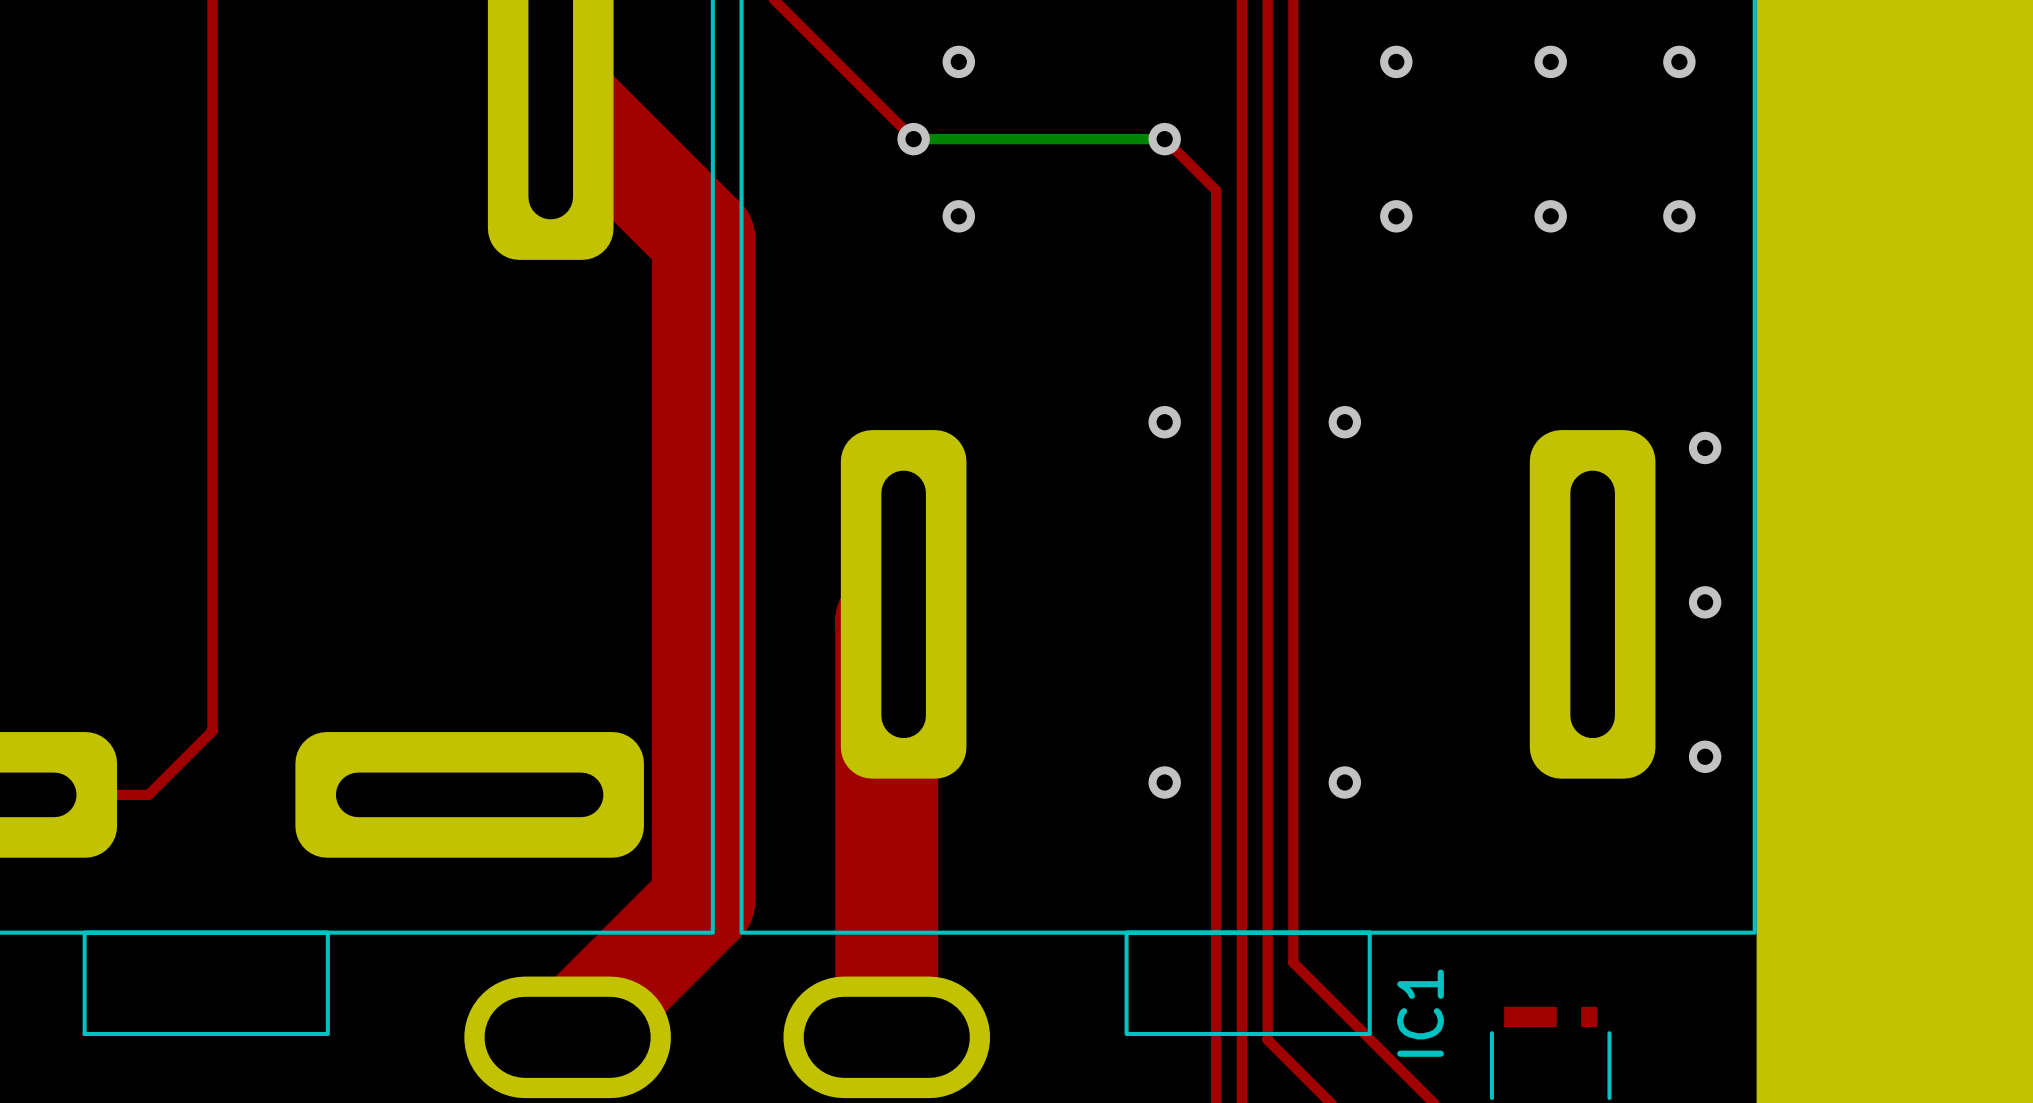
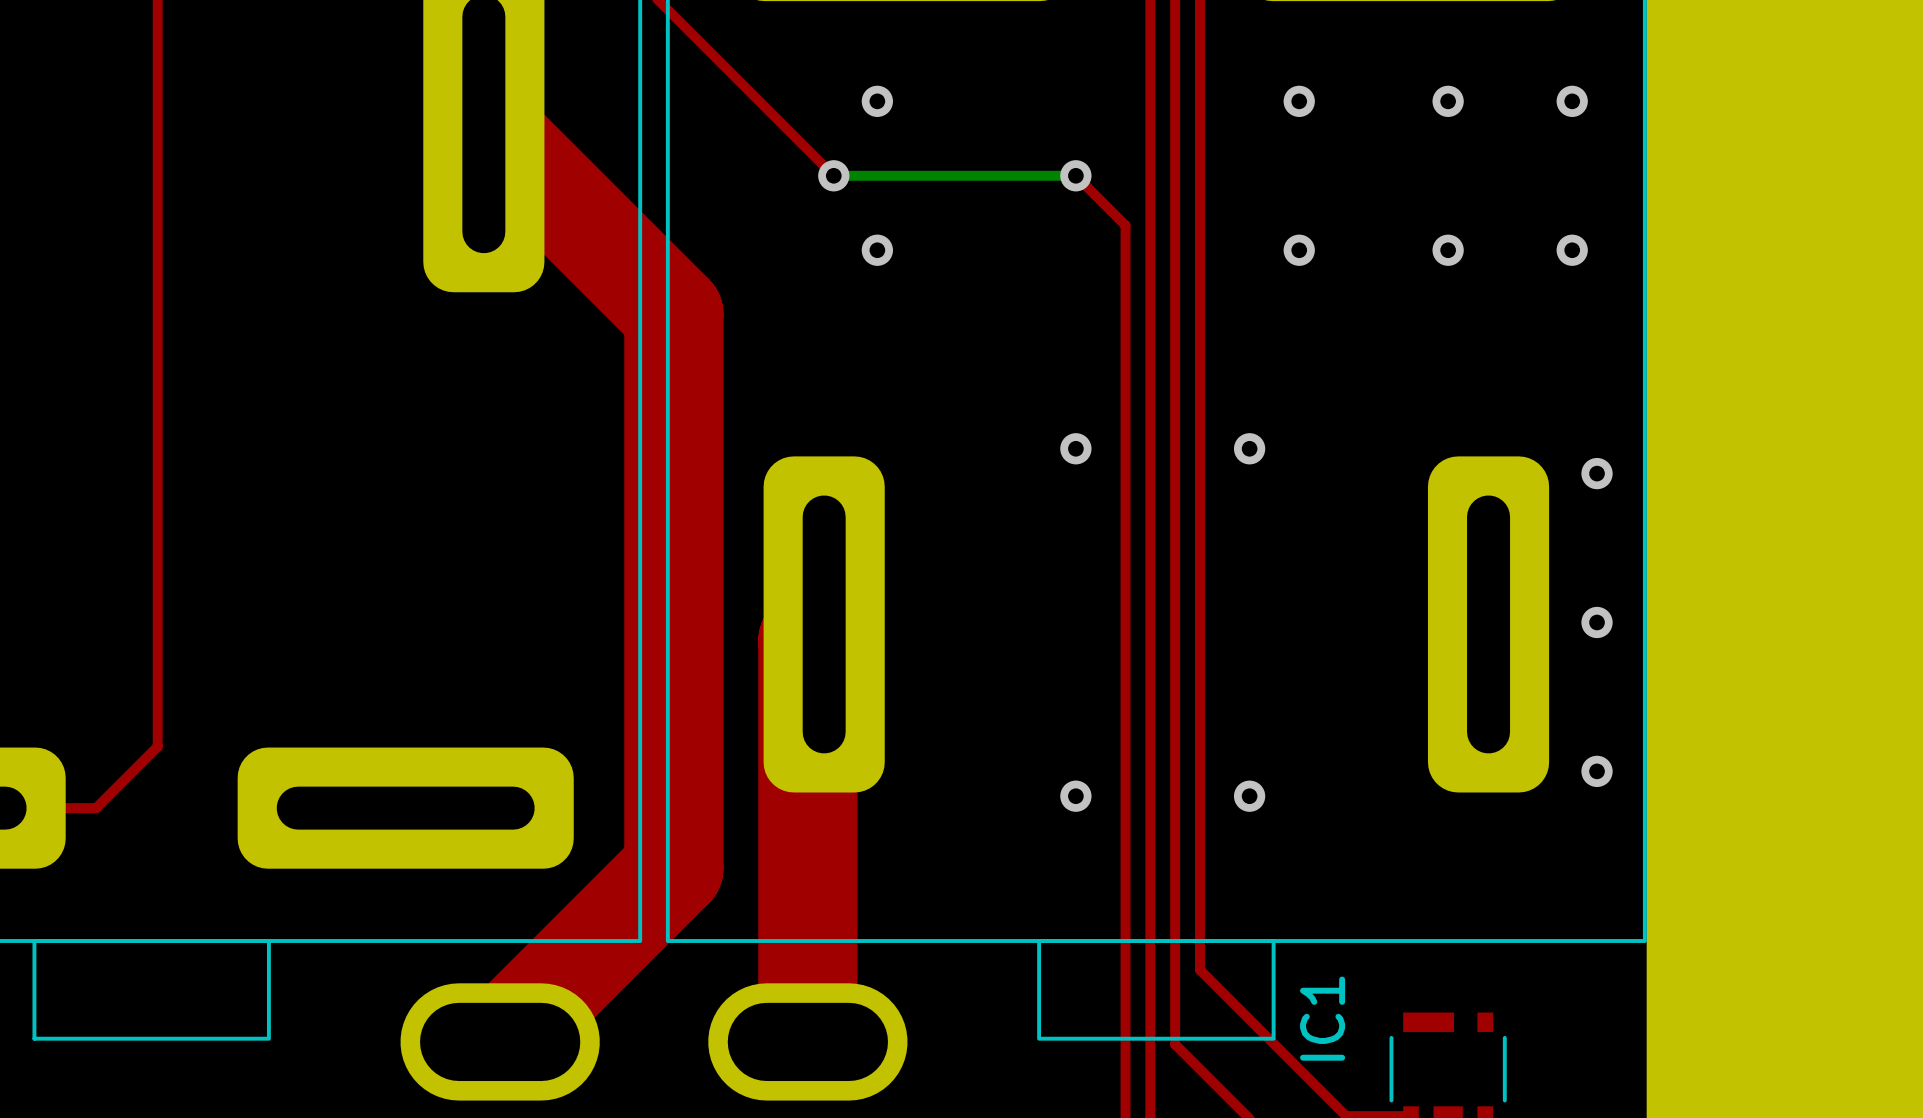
top track: (703, 238) (703, 901) -> (631, 271) (673, 314) (673, 868) (631, 910)

